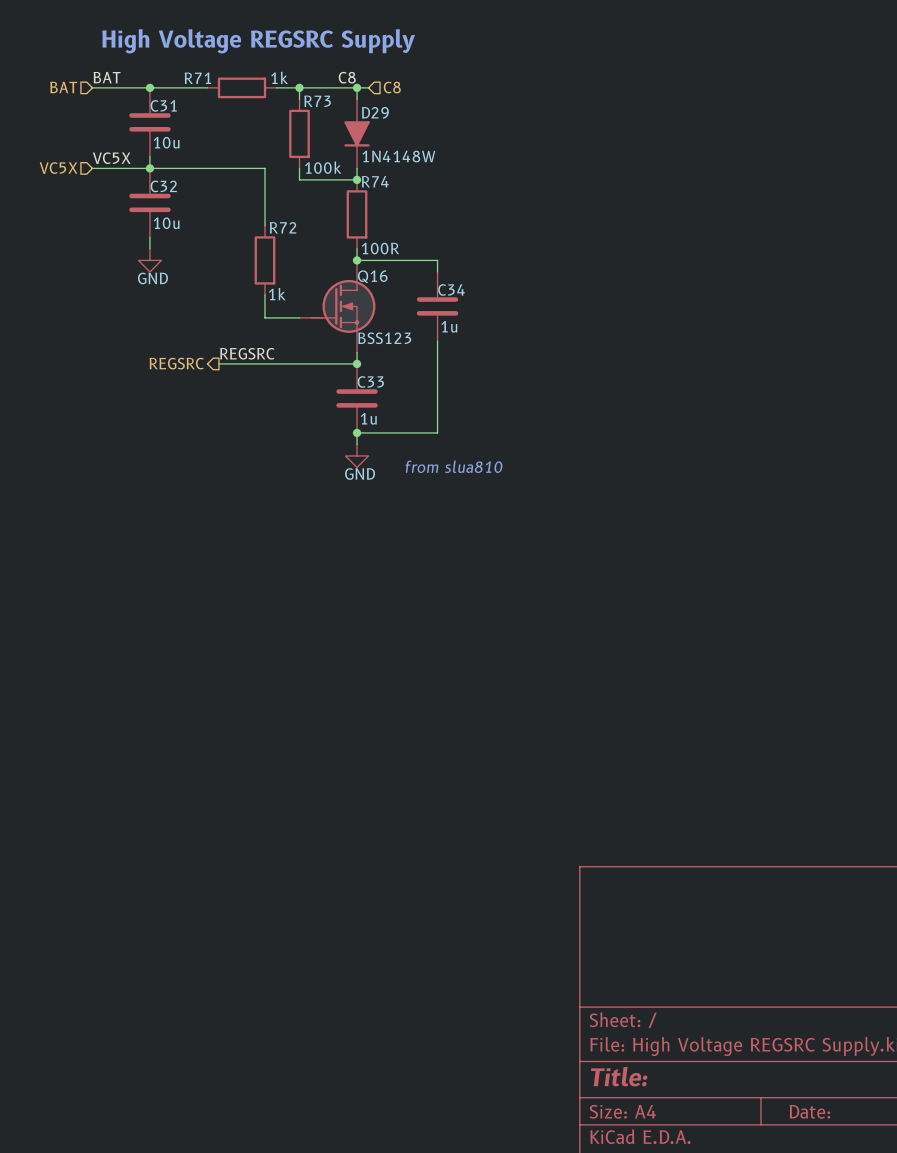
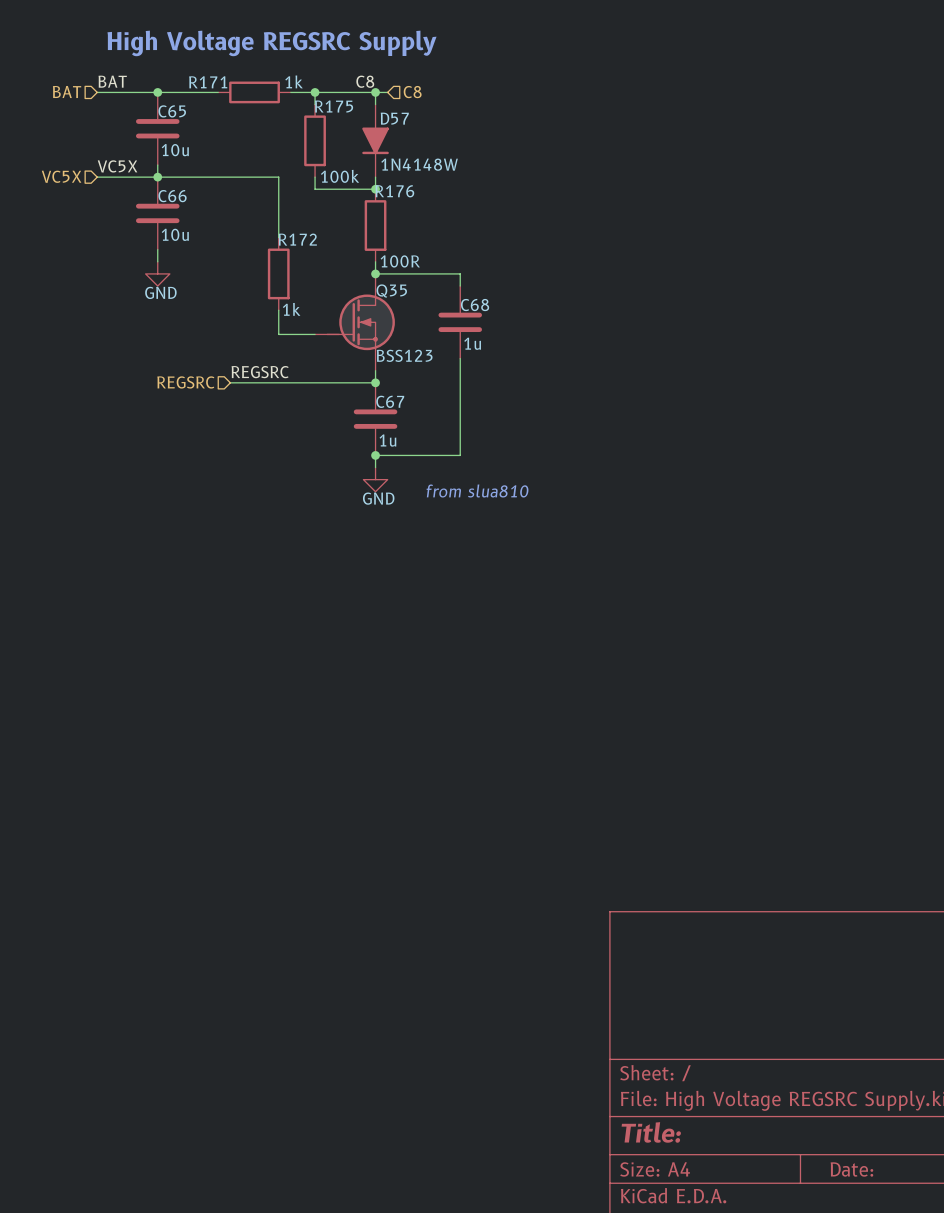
R71 name: R71 (197, 78) -> R171 (208, 82)
R73 name: R73 (317, 101) -> R175 (334, 106)
C31 name: C31 (163, 105) -> C65 (172, 111)
D29 name: D29 (375, 112) -> D57 (394, 118)
R74 name: R74 (375, 181) -> R176 (394, 191)
C32 name: C32 (163, 186) -> C66 (172, 196)
R72 name: R72 (283, 227) -> R172 (297, 239)
Q16 name: Q16 (372, 276) -> Q35 (391, 291)
C34 name: C34 (451, 289) -> C68 (475, 305)
hierarchical label shape: output (176, 363) -> input (185, 382)
C33 name: C33 (370, 382) -> C67 (390, 401)

